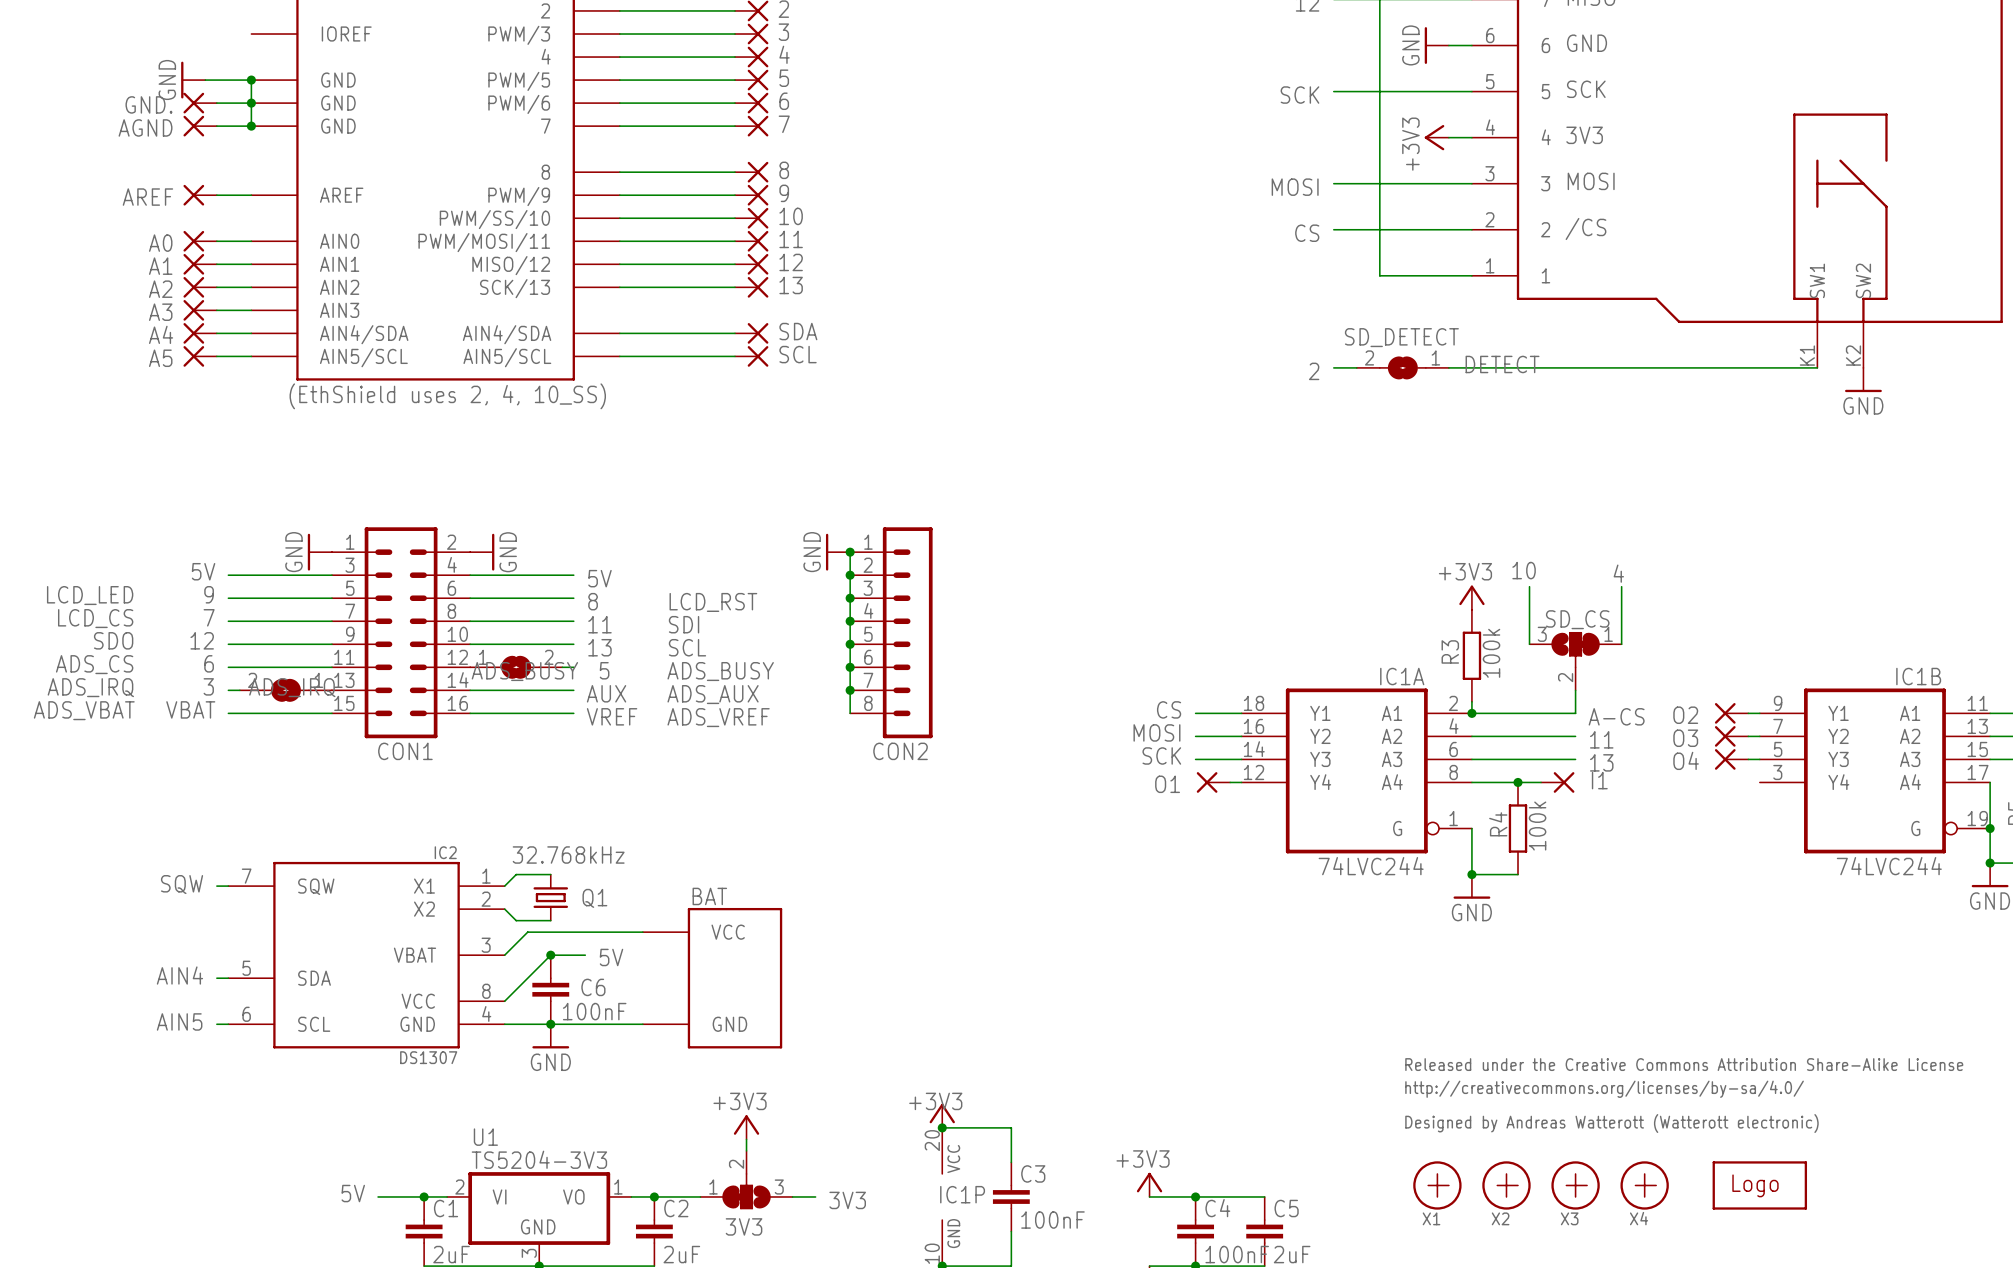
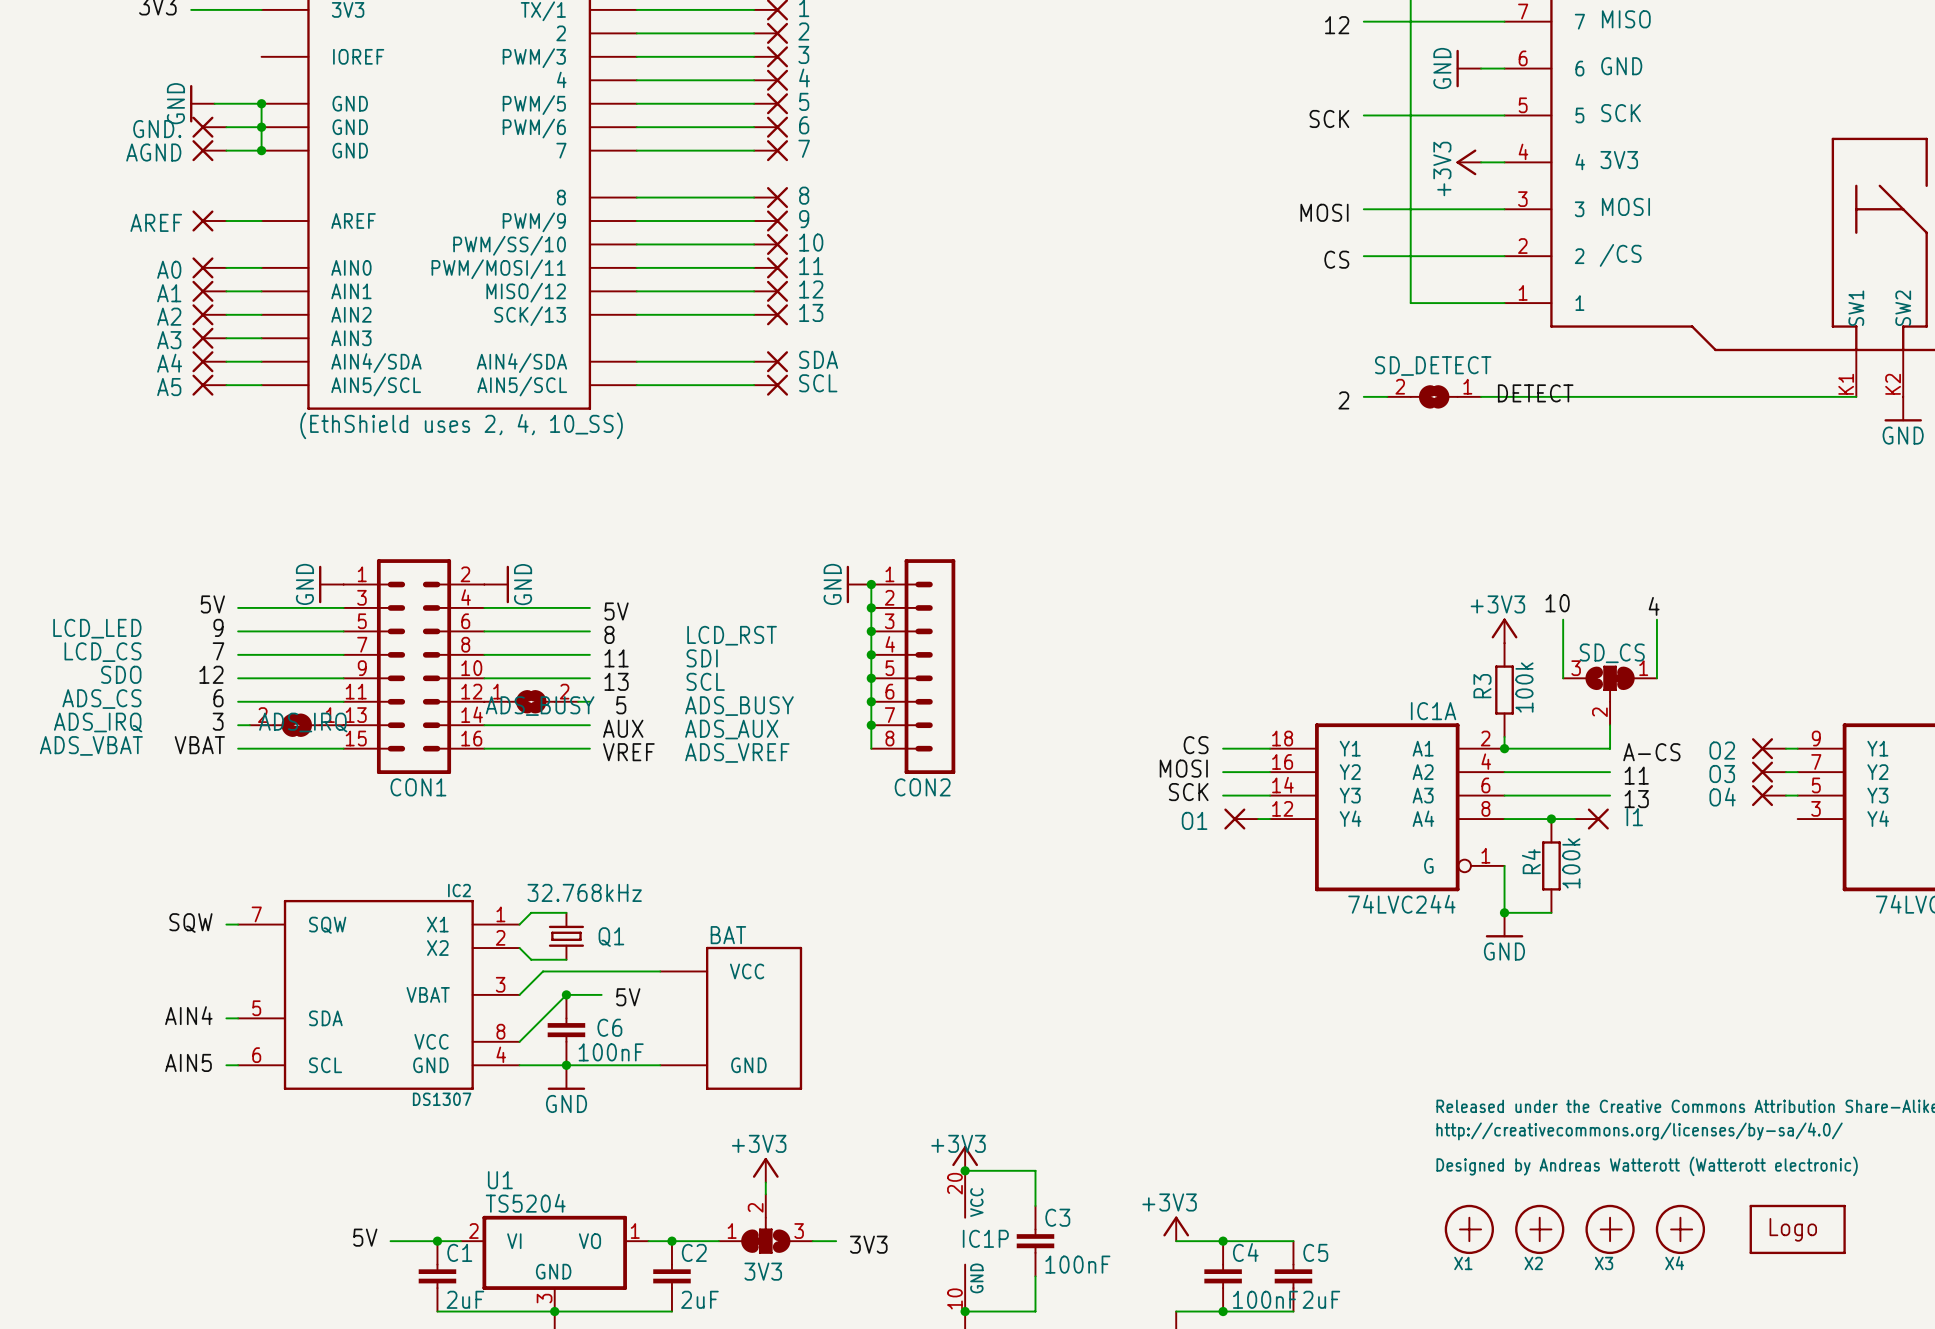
U1 value: TS5204-3V3 (539, 1159) -> TS5204 (525, 1203)

